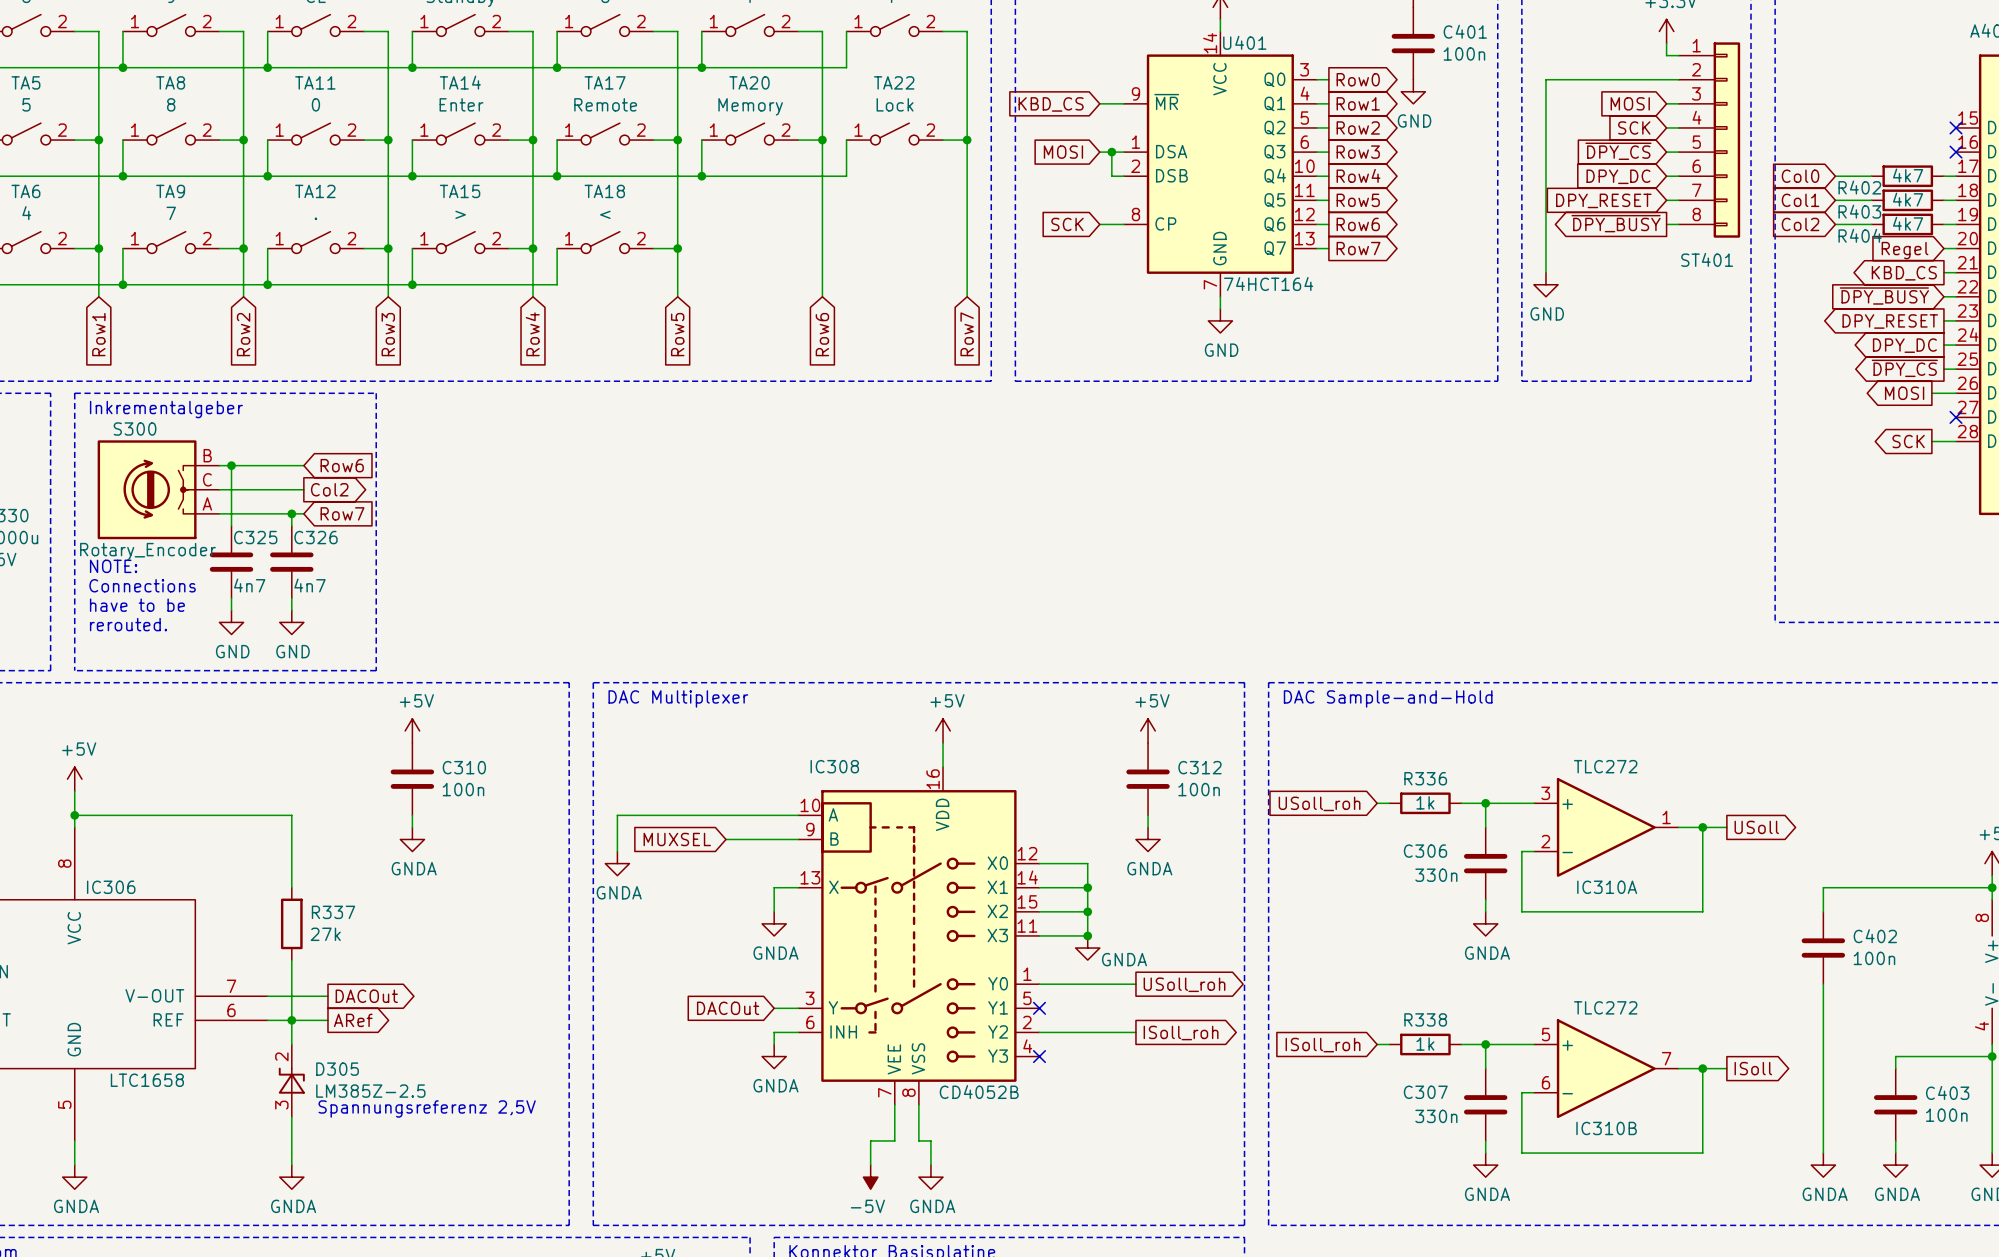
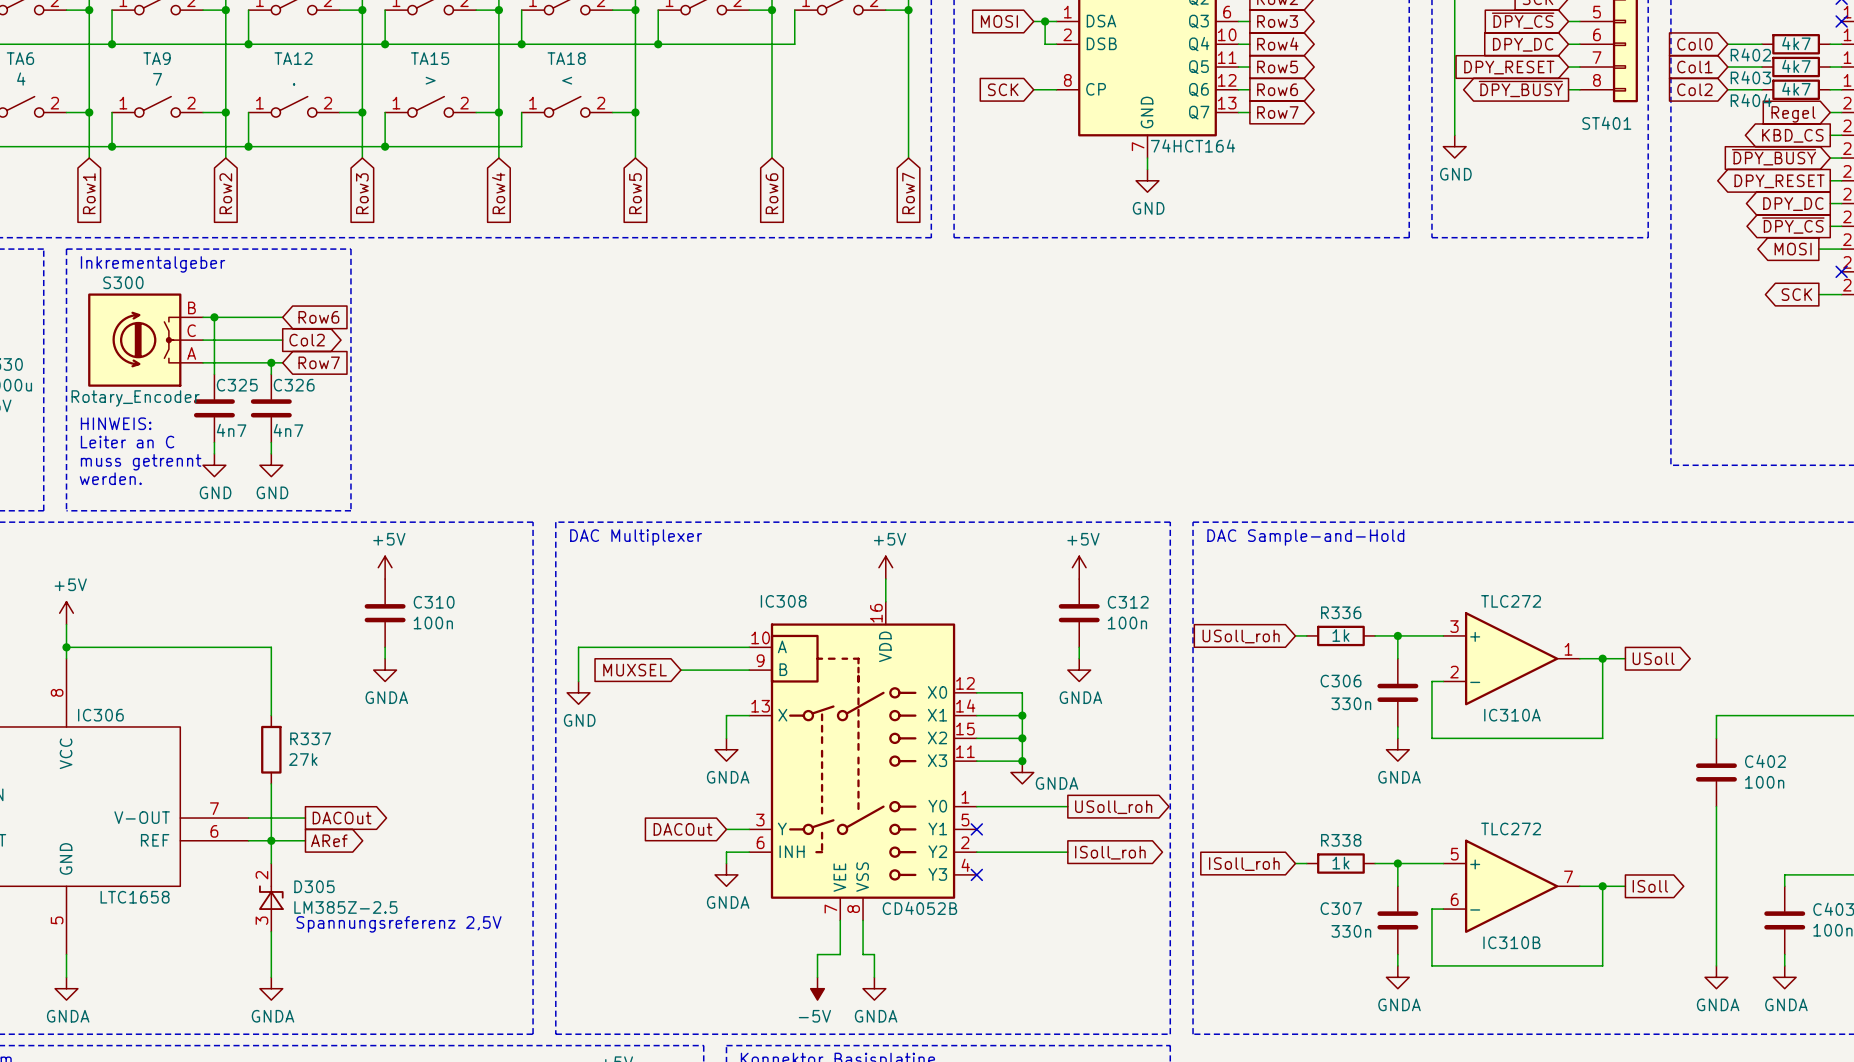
text: NOTE: (113, 566) -> none
text: none -> HINWEIS: (116, 423)
text: Connections (142, 585) -> none
text: none -> Leiter an C (127, 442)
text: have to be (137, 605) -> none
text: none -> muss getrennt (141, 462)
text: rerouted. (128, 624) -> none
text: none -> werden. (110, 478)
power symbol: GNDA (617, 863) -> GND (578, 692)

